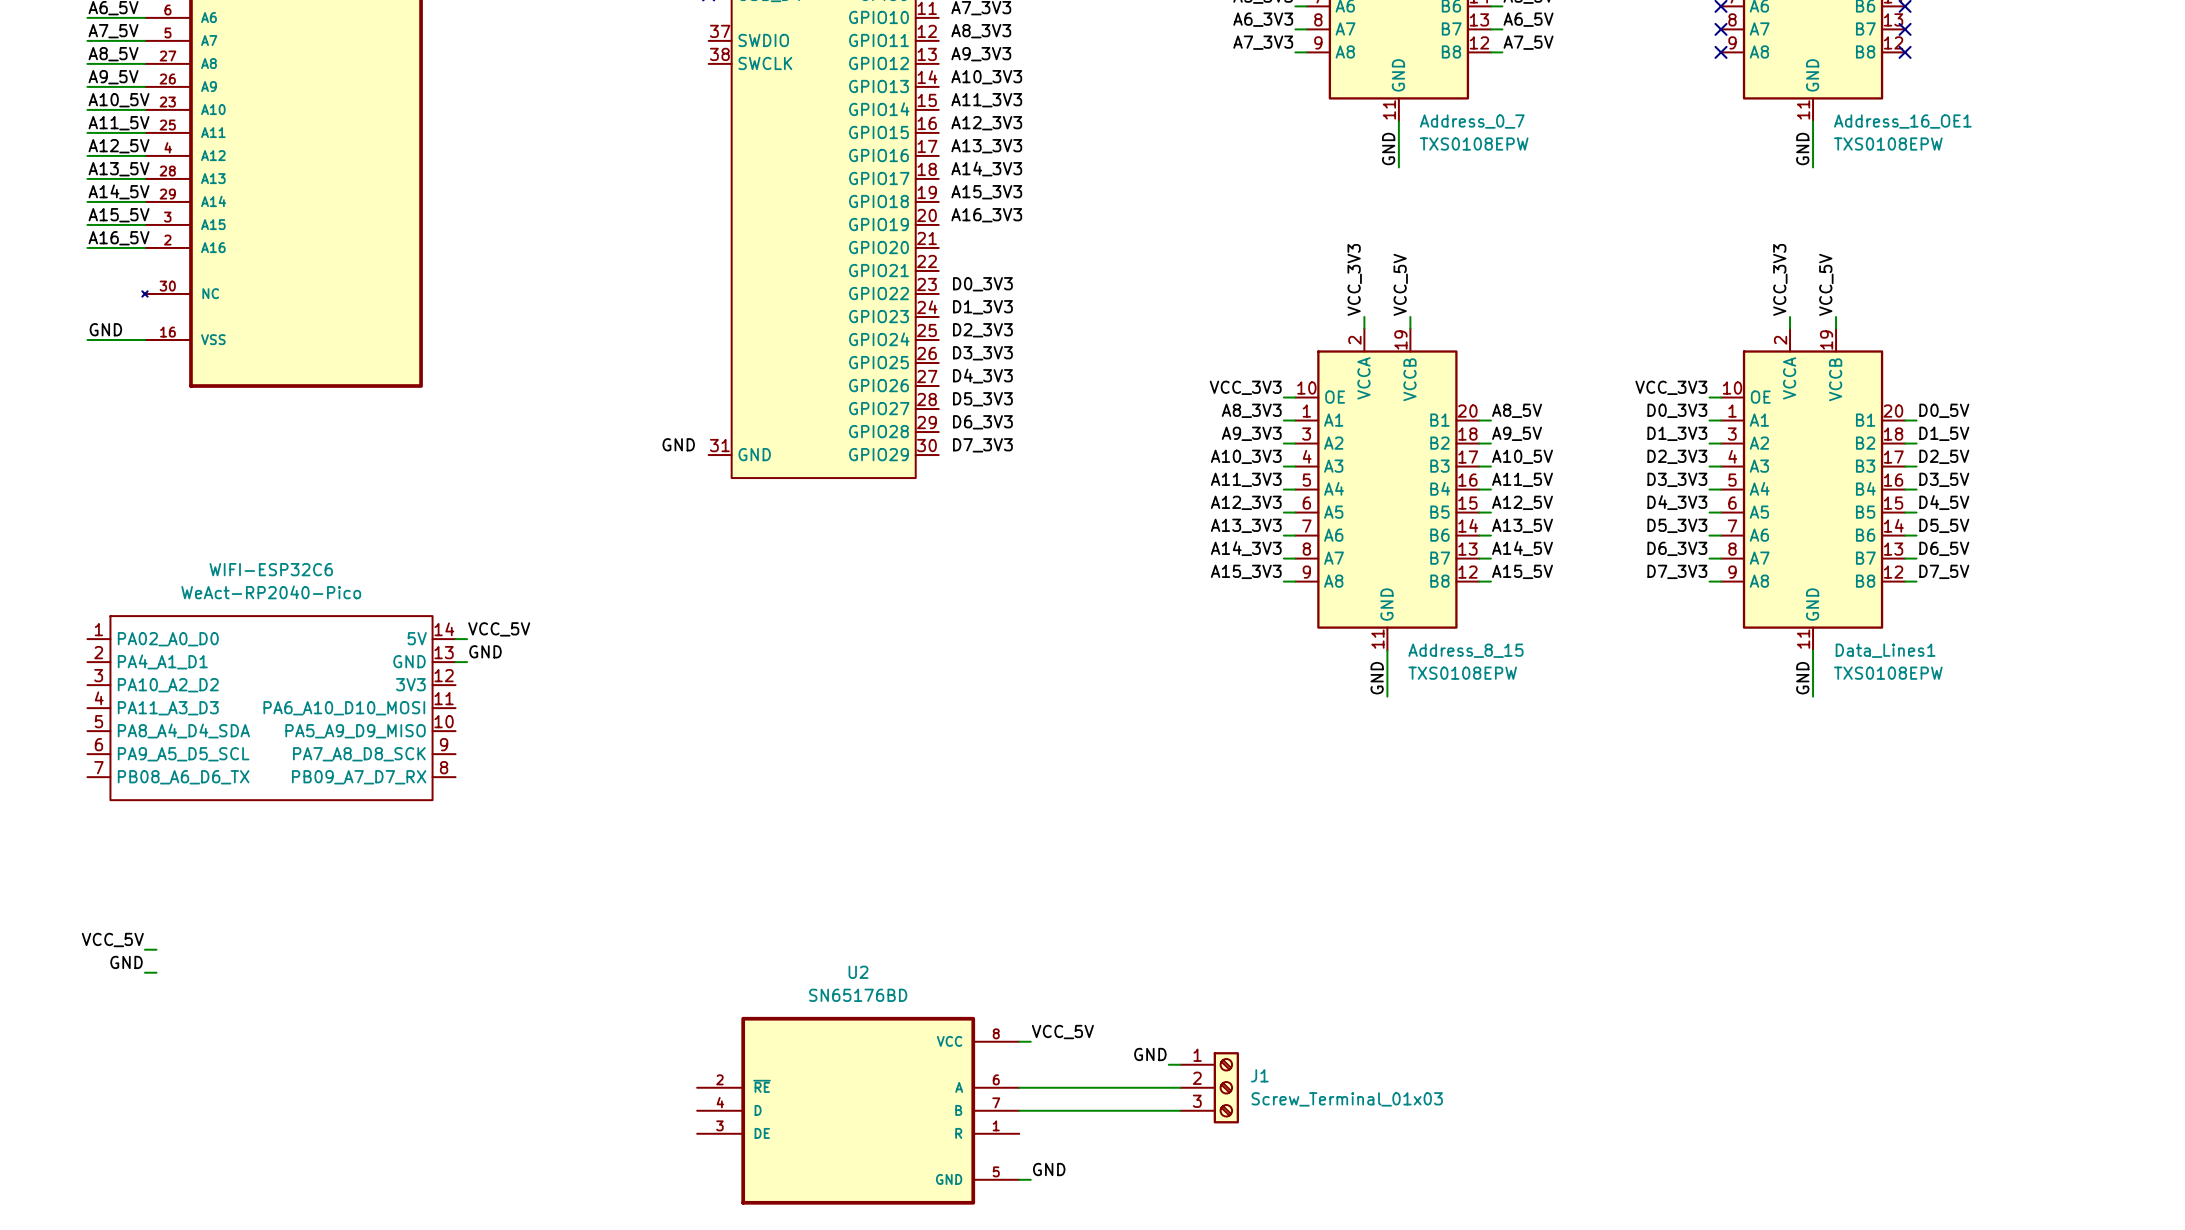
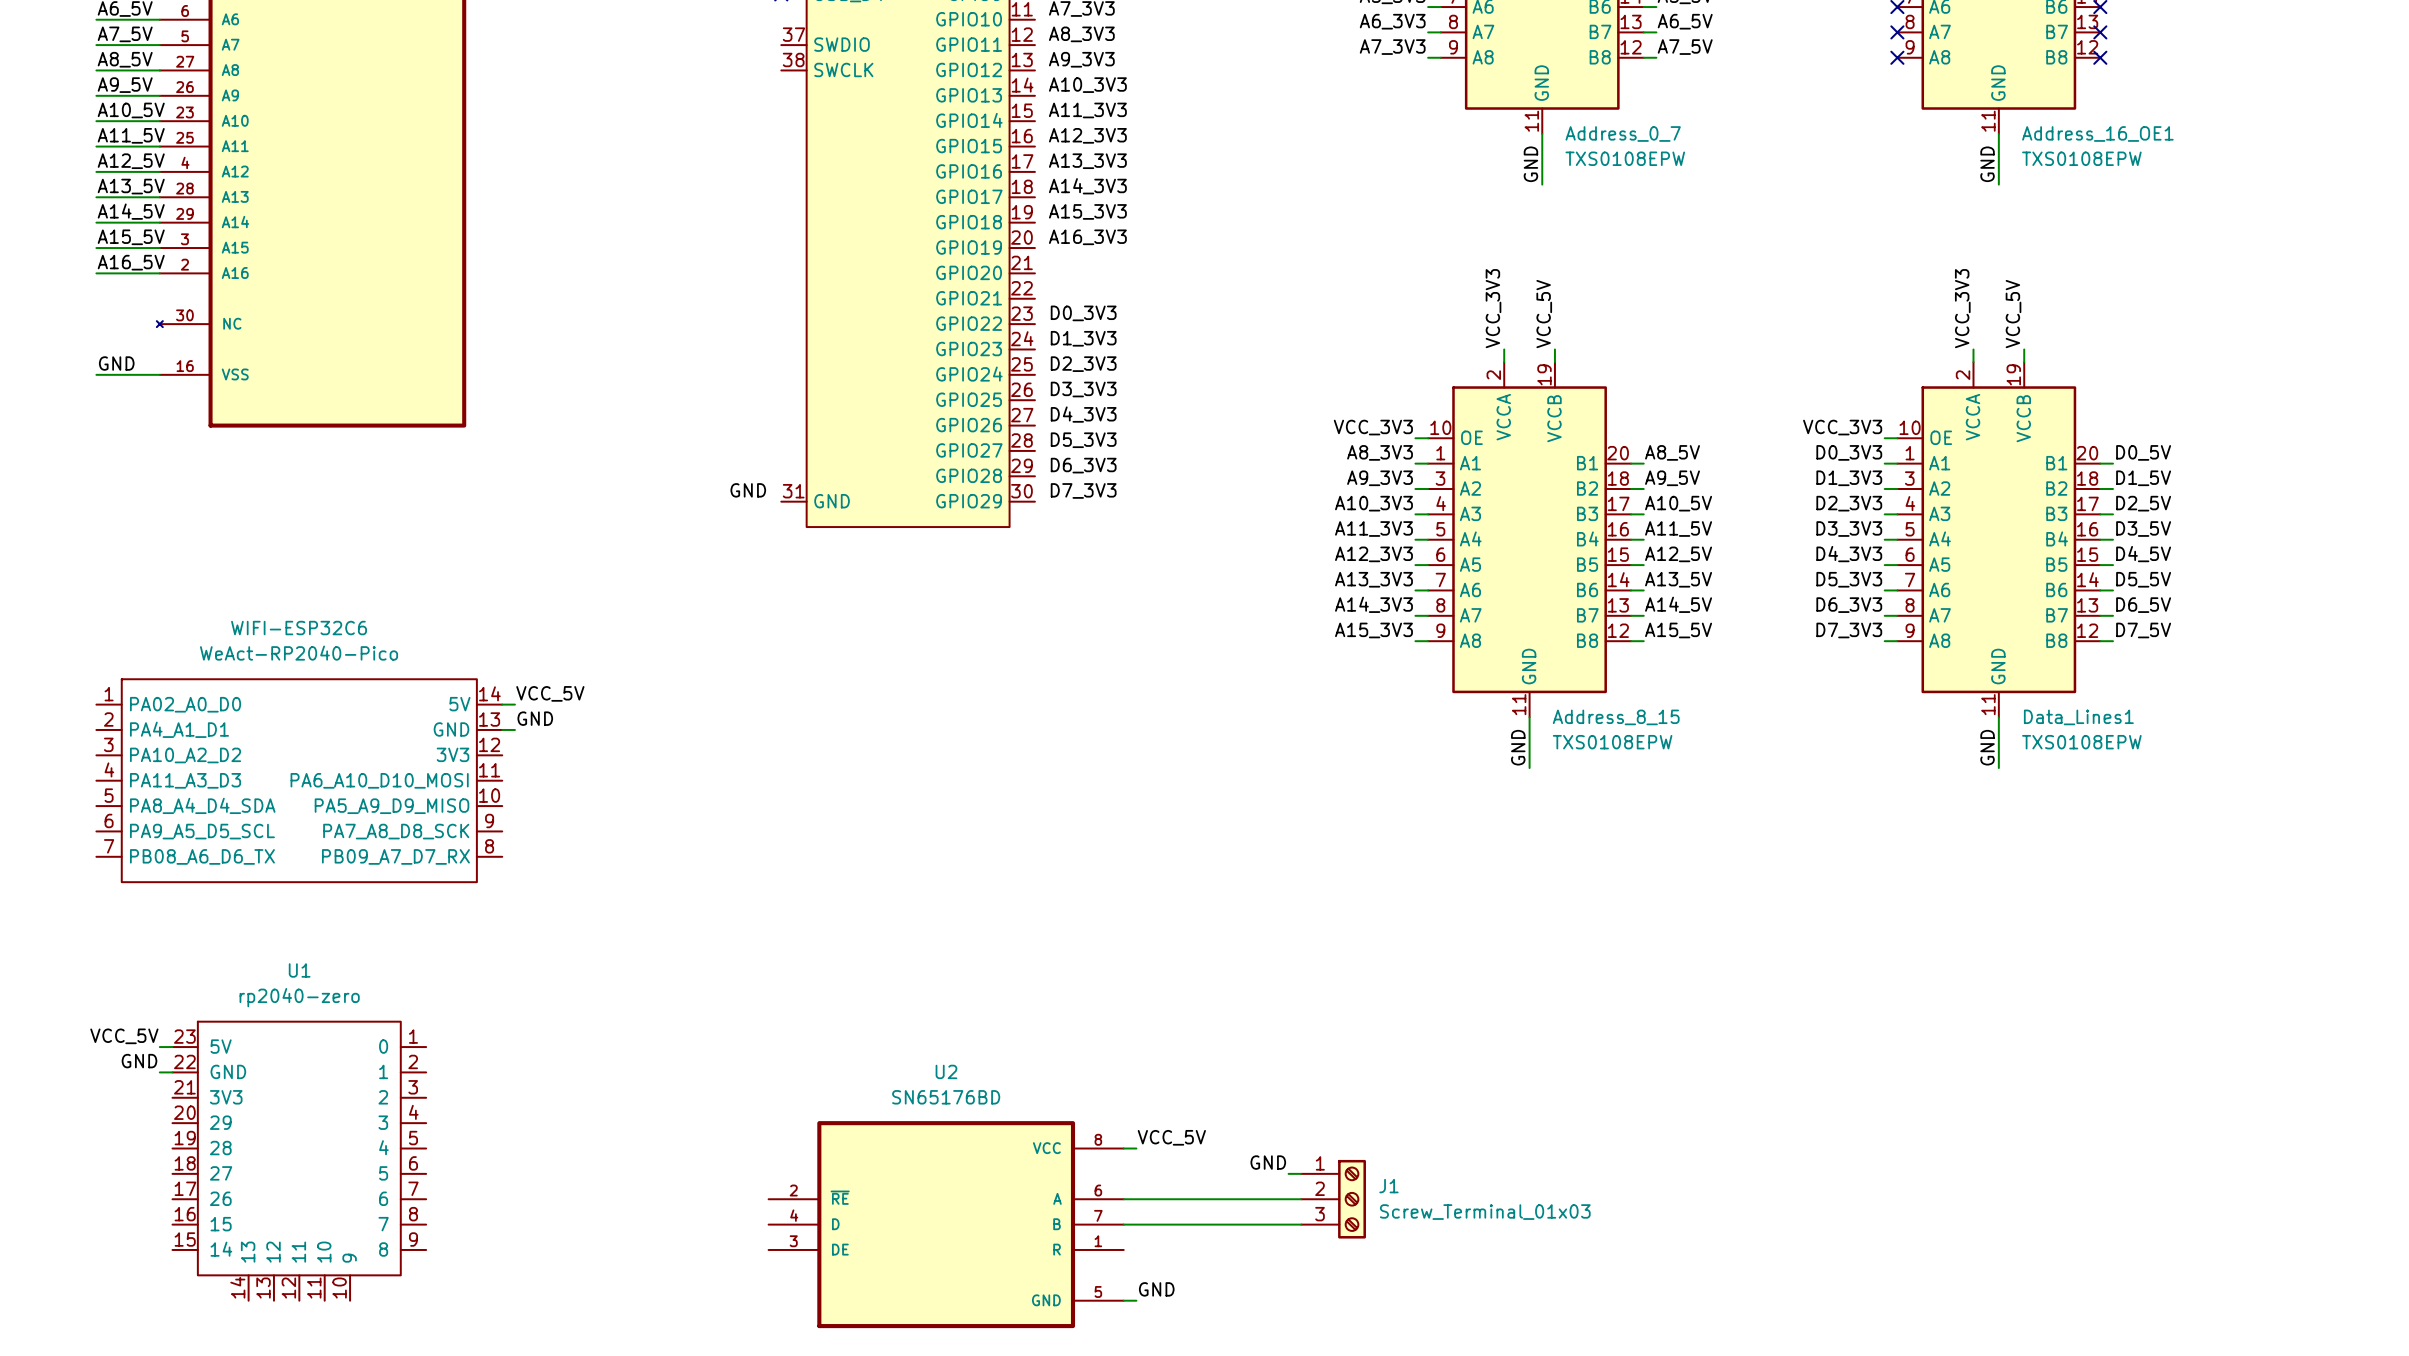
U1: none -> rp2040-zero (299, 1161)

